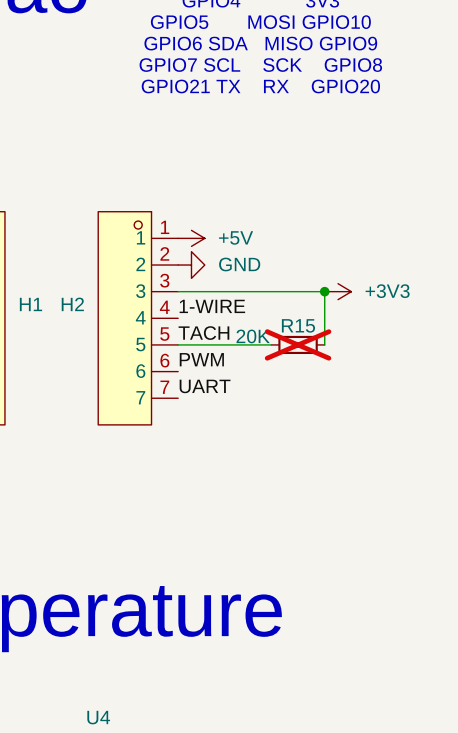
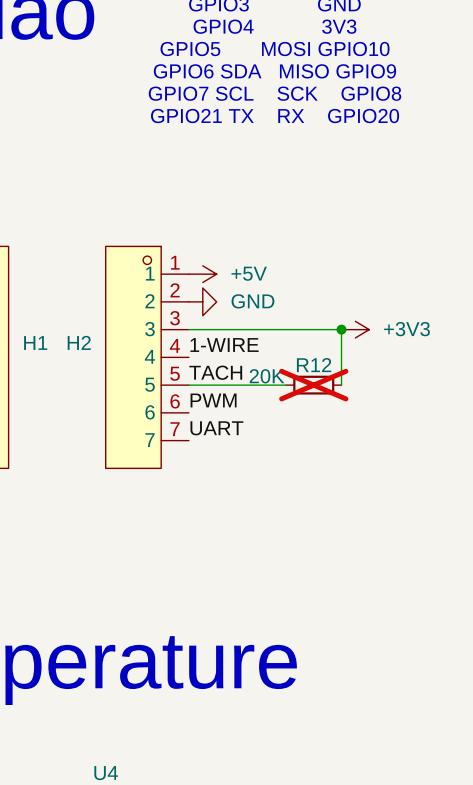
R15 name: R15 (298, 325) -> R12 (314, 365)

